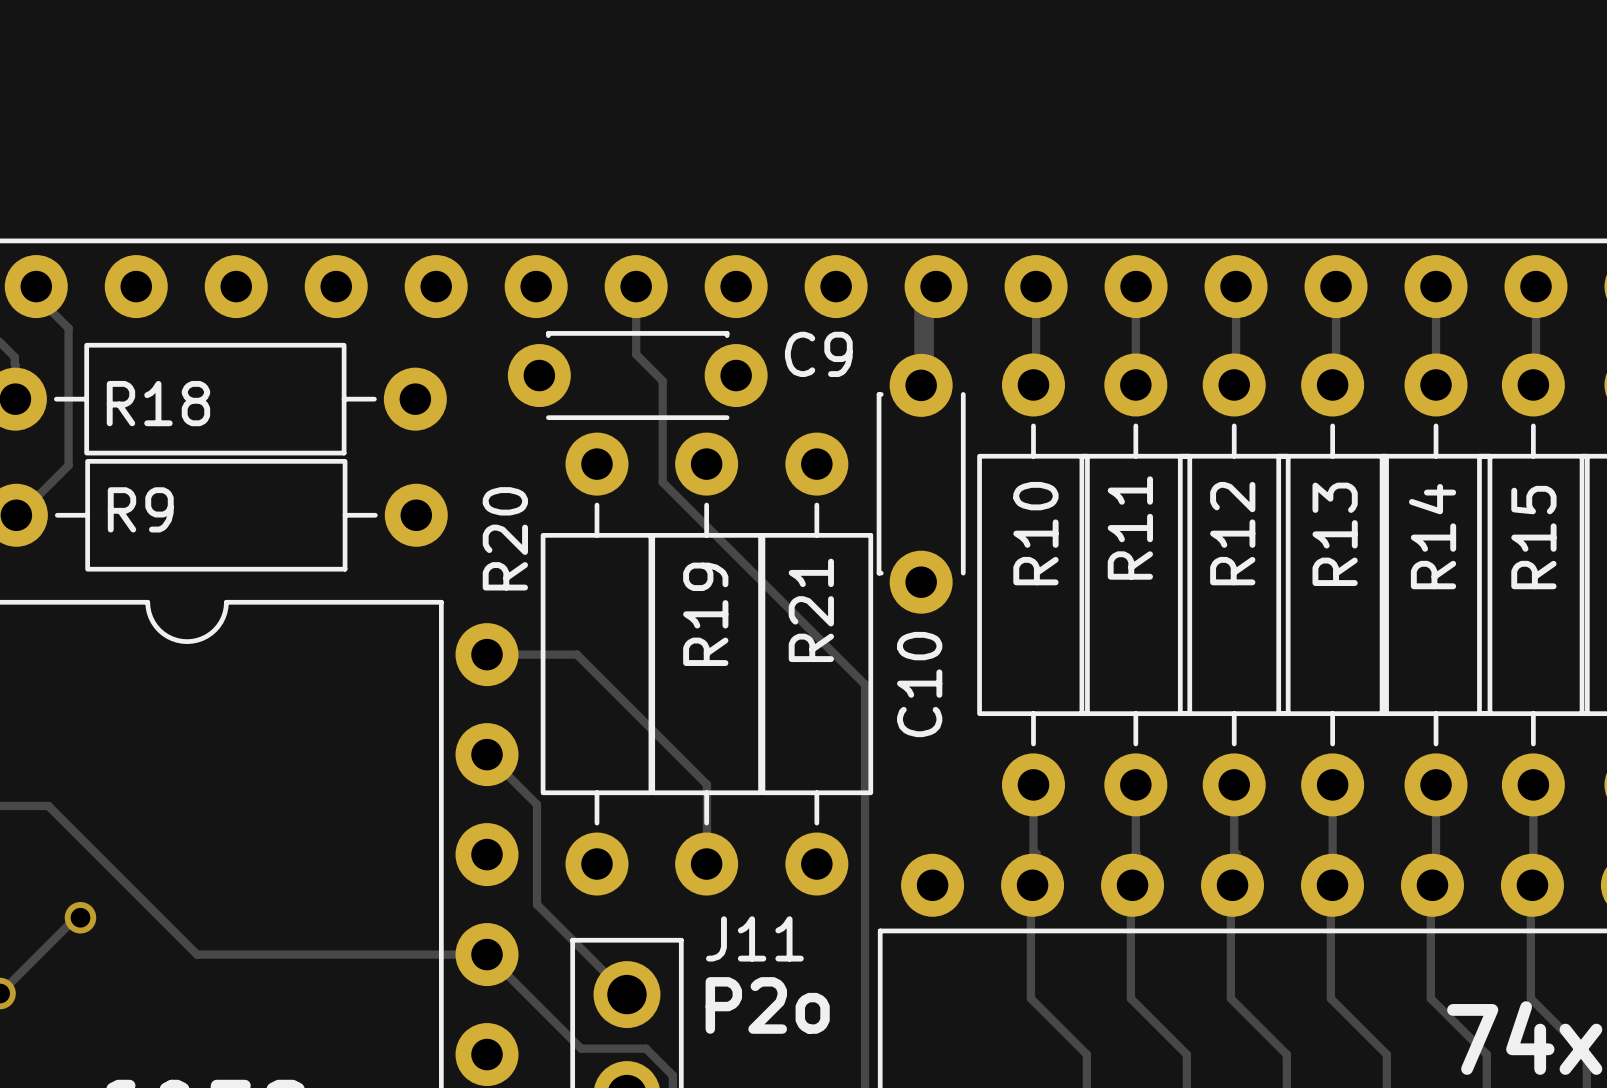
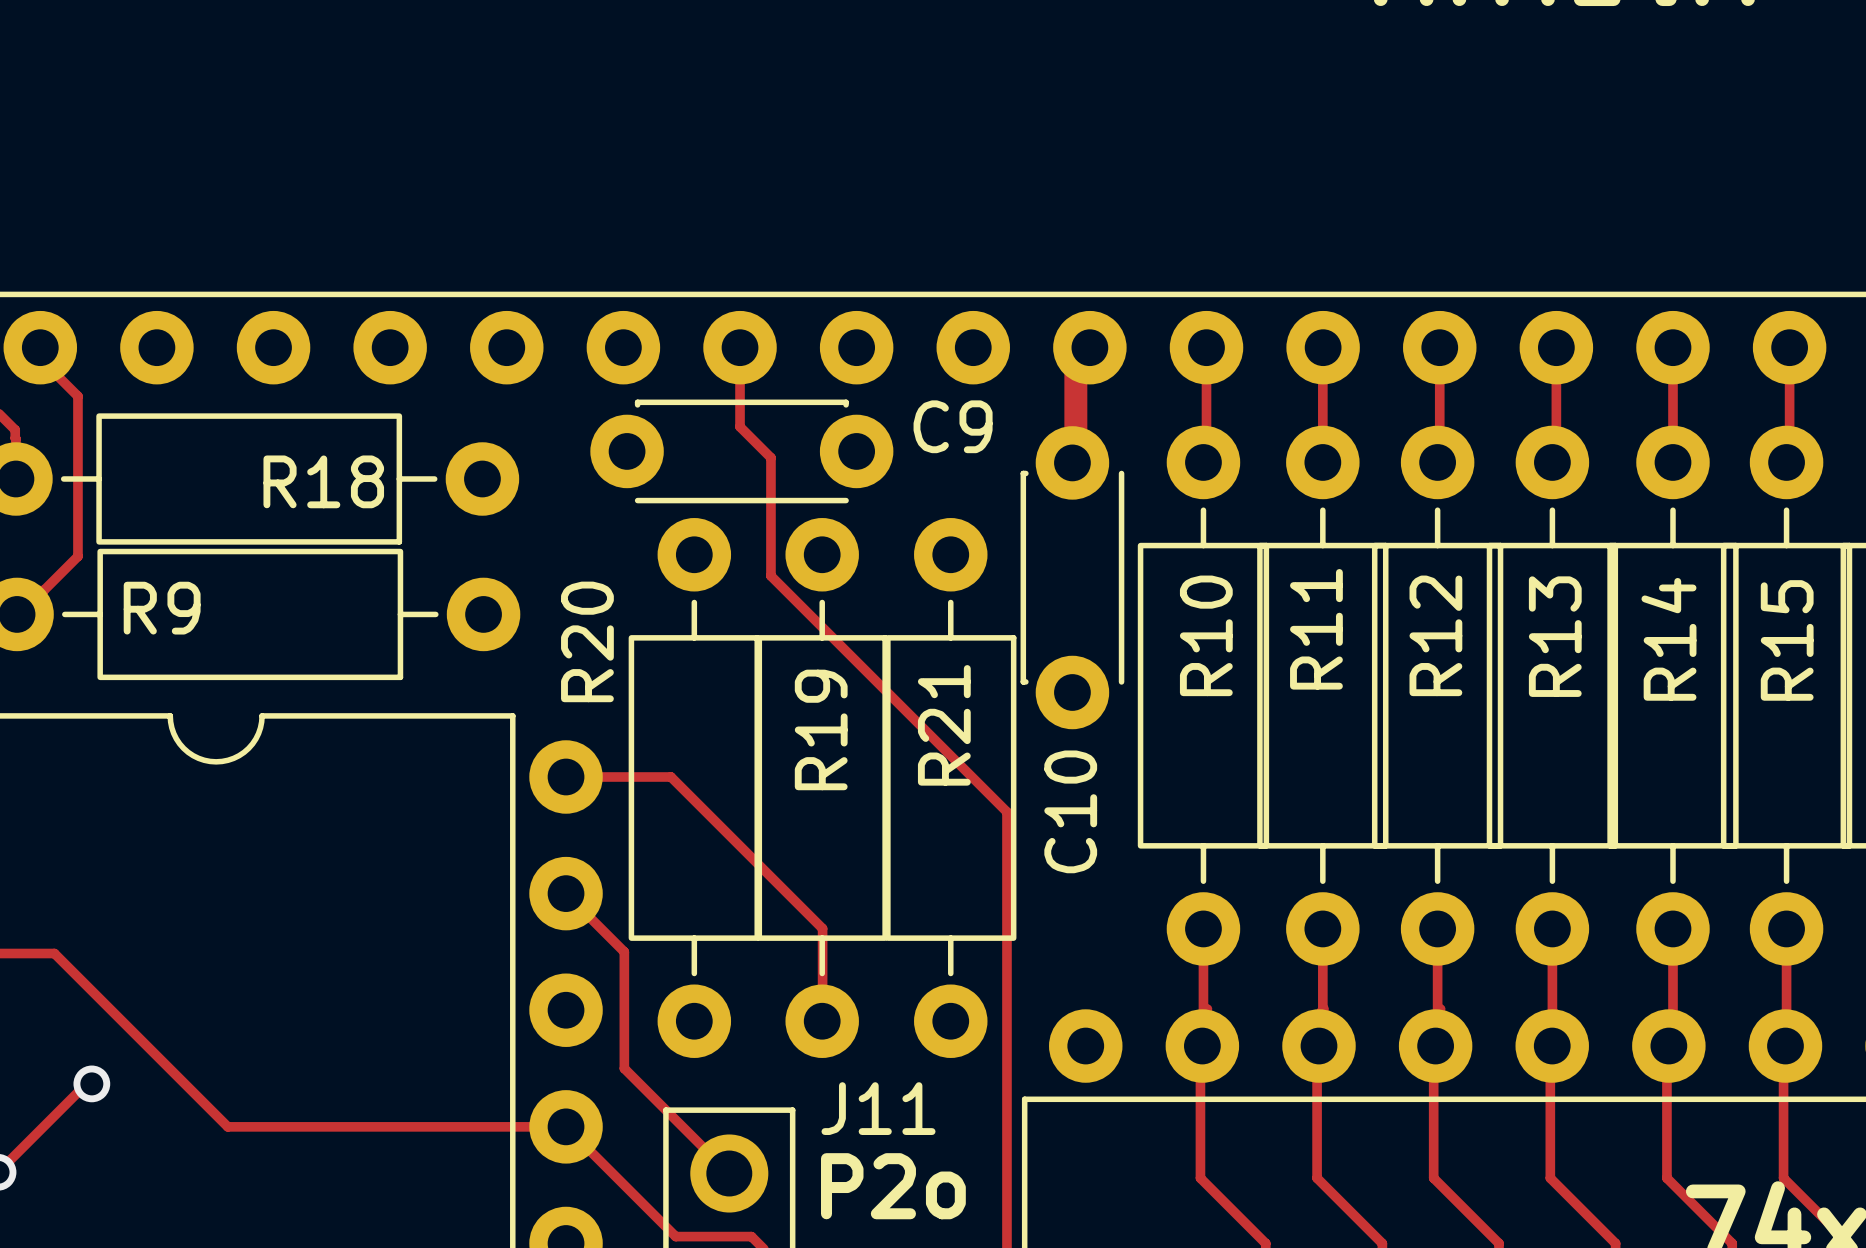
R18 name position: R18 (158, 403) -> R18 (323, 481)

